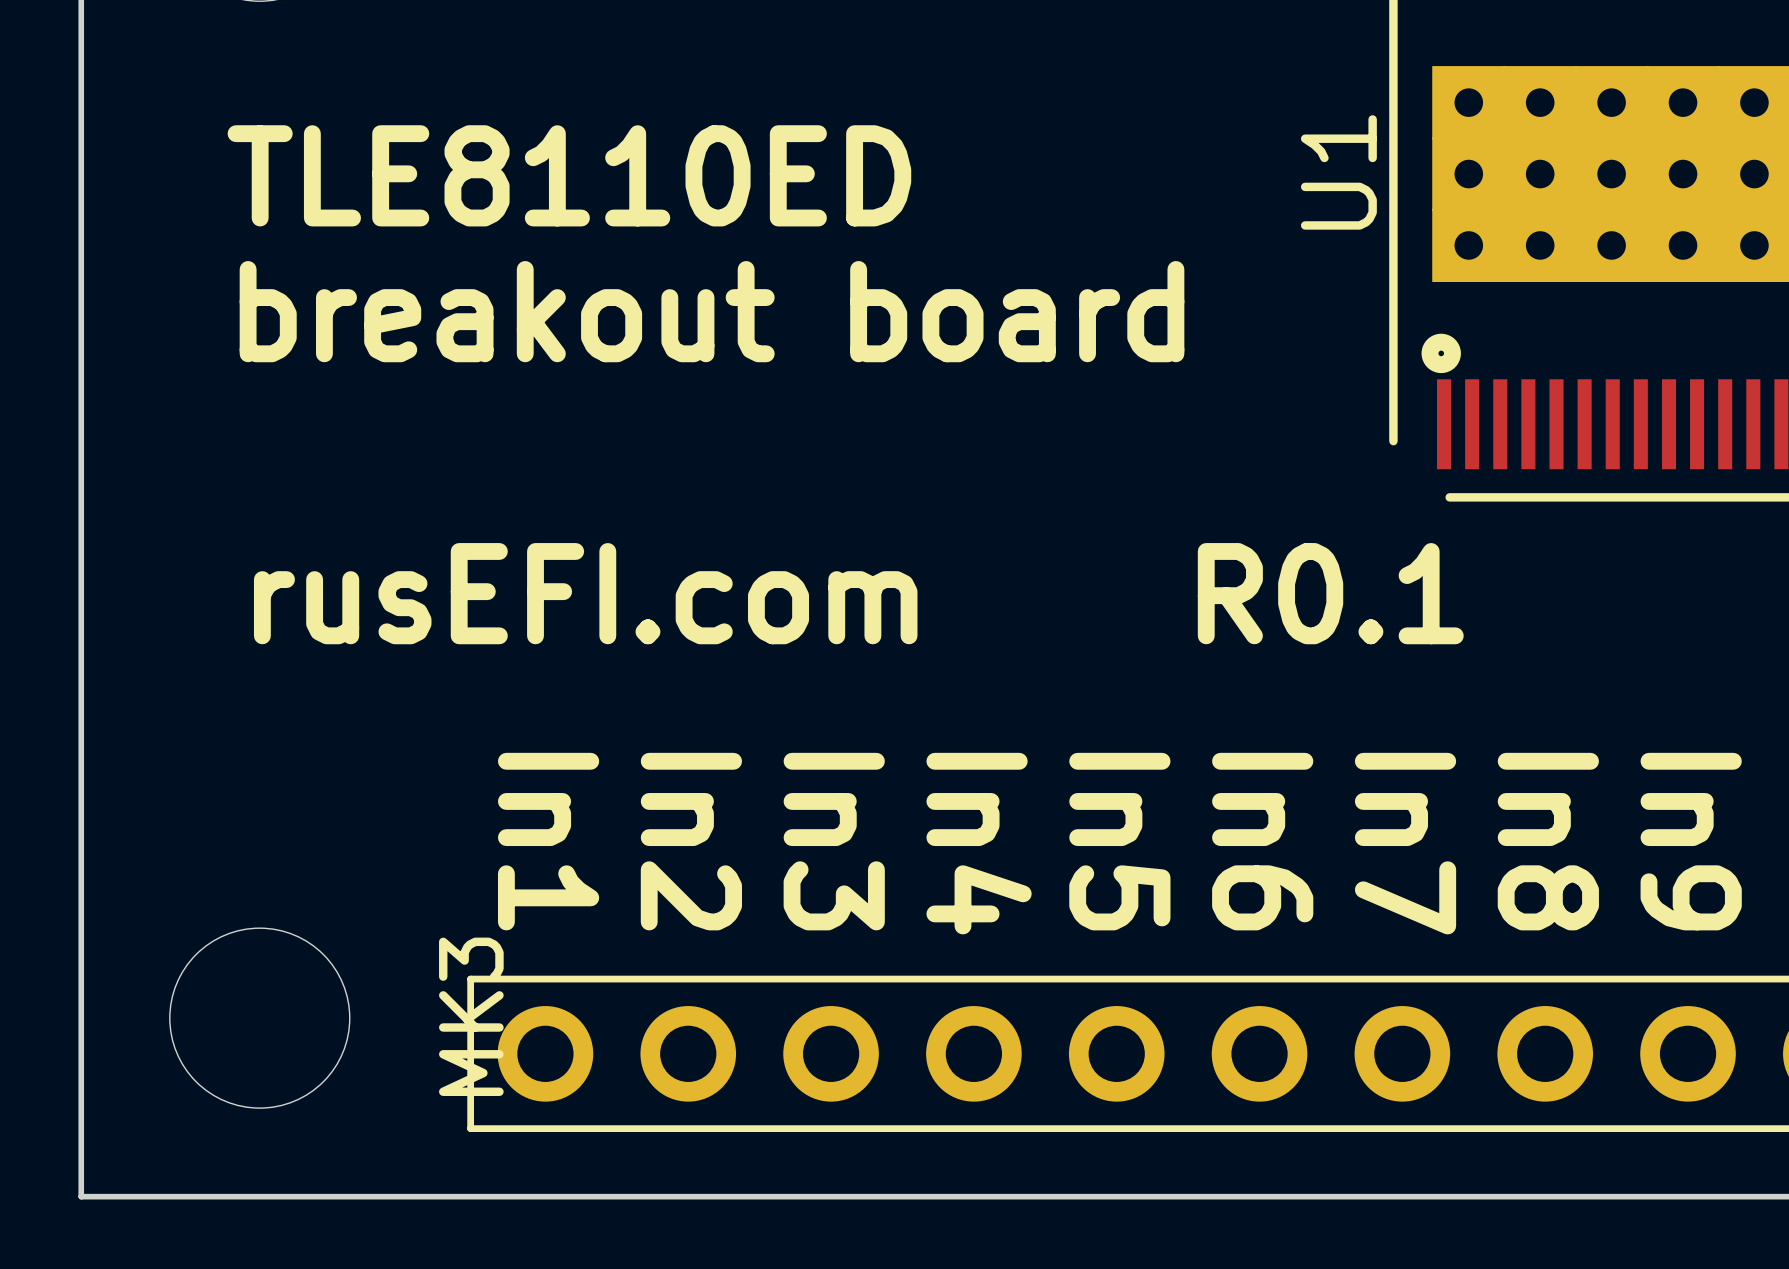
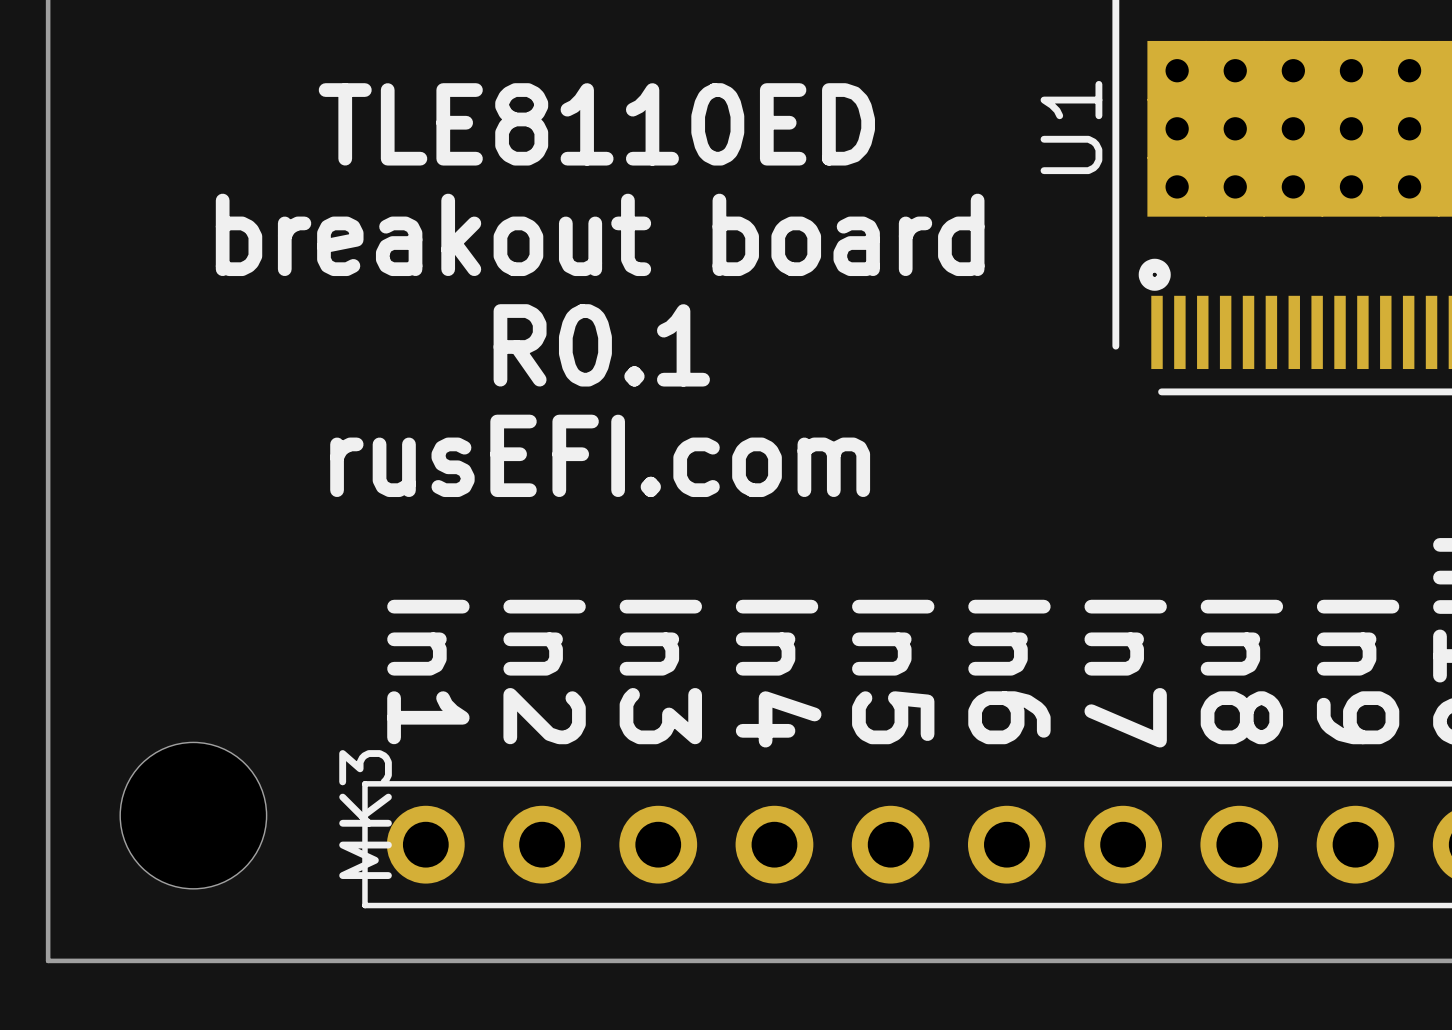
text position: TLE8110ED (569, 175) -> TLE8110ED (596, 124)
text position: breakout board (712, 311) -> breakout board (600, 234)
text: none -> R0.1 (601, 345)
text: rusEFI.com R0.1 (858, 593) -> rusEFI.com (600, 455)

